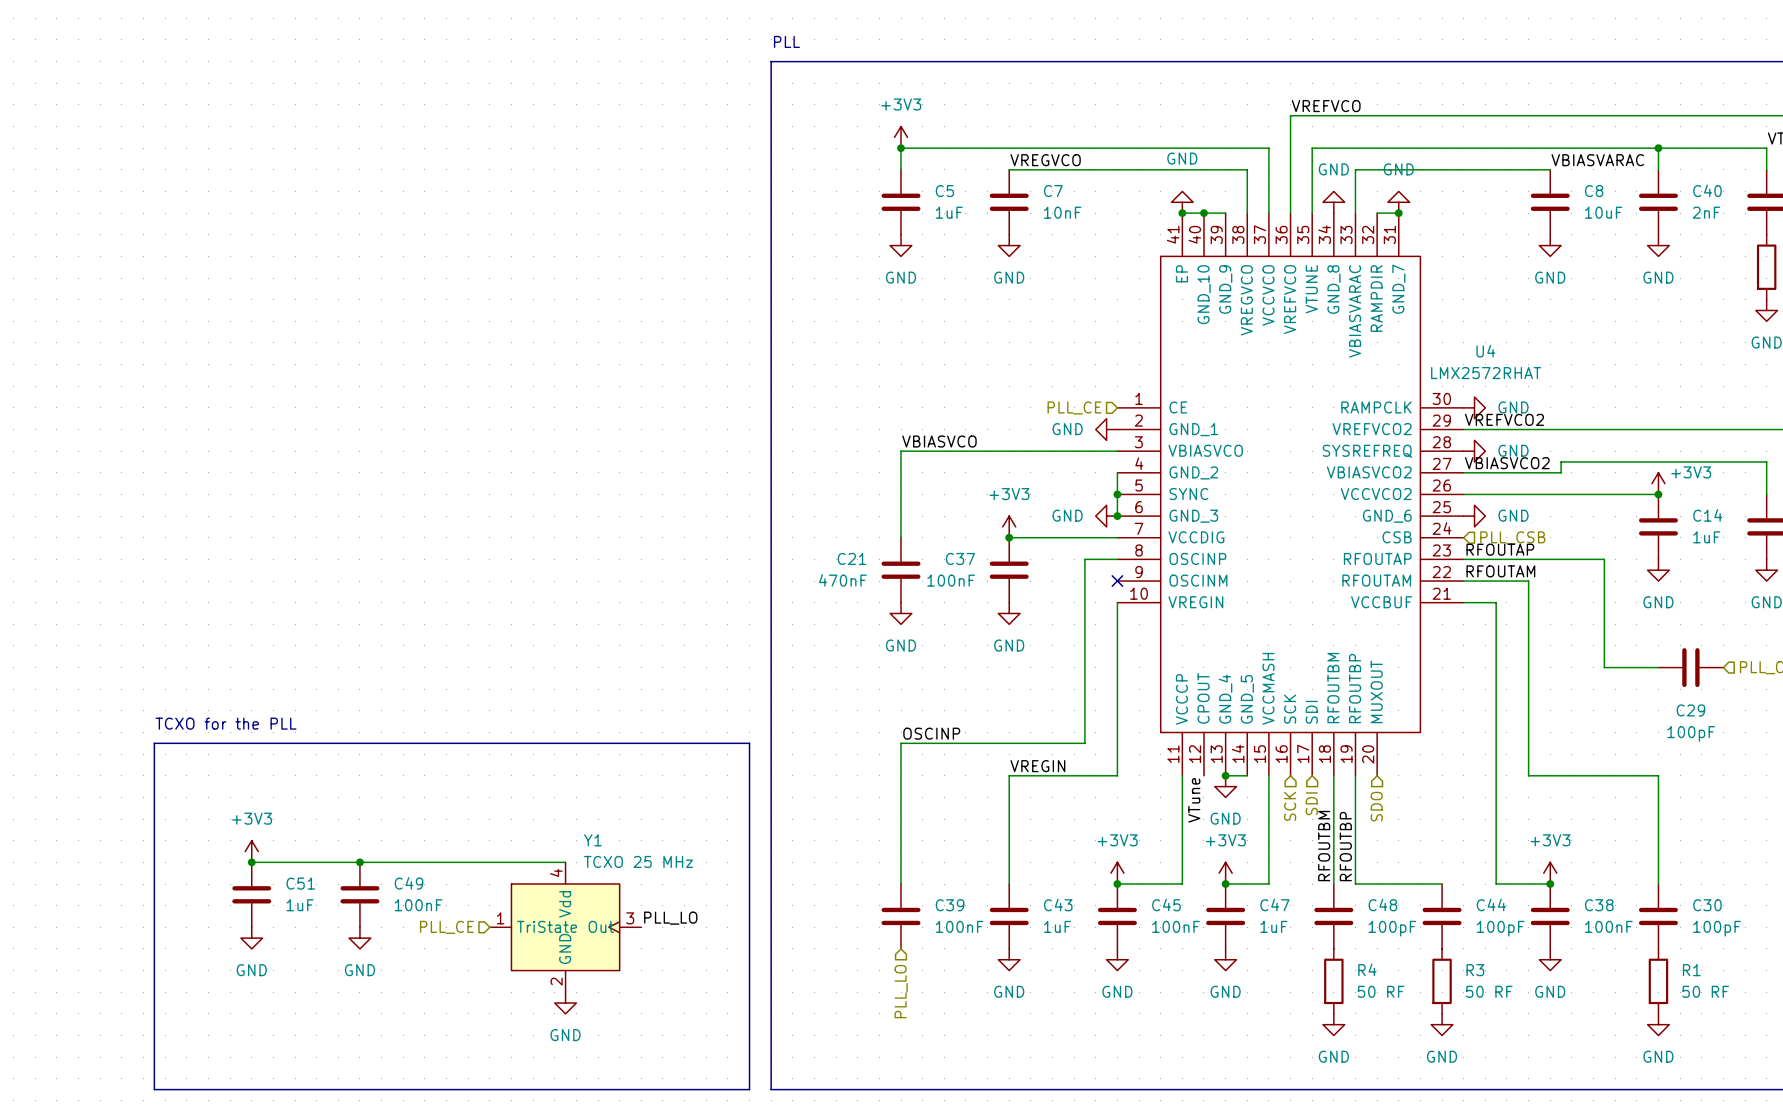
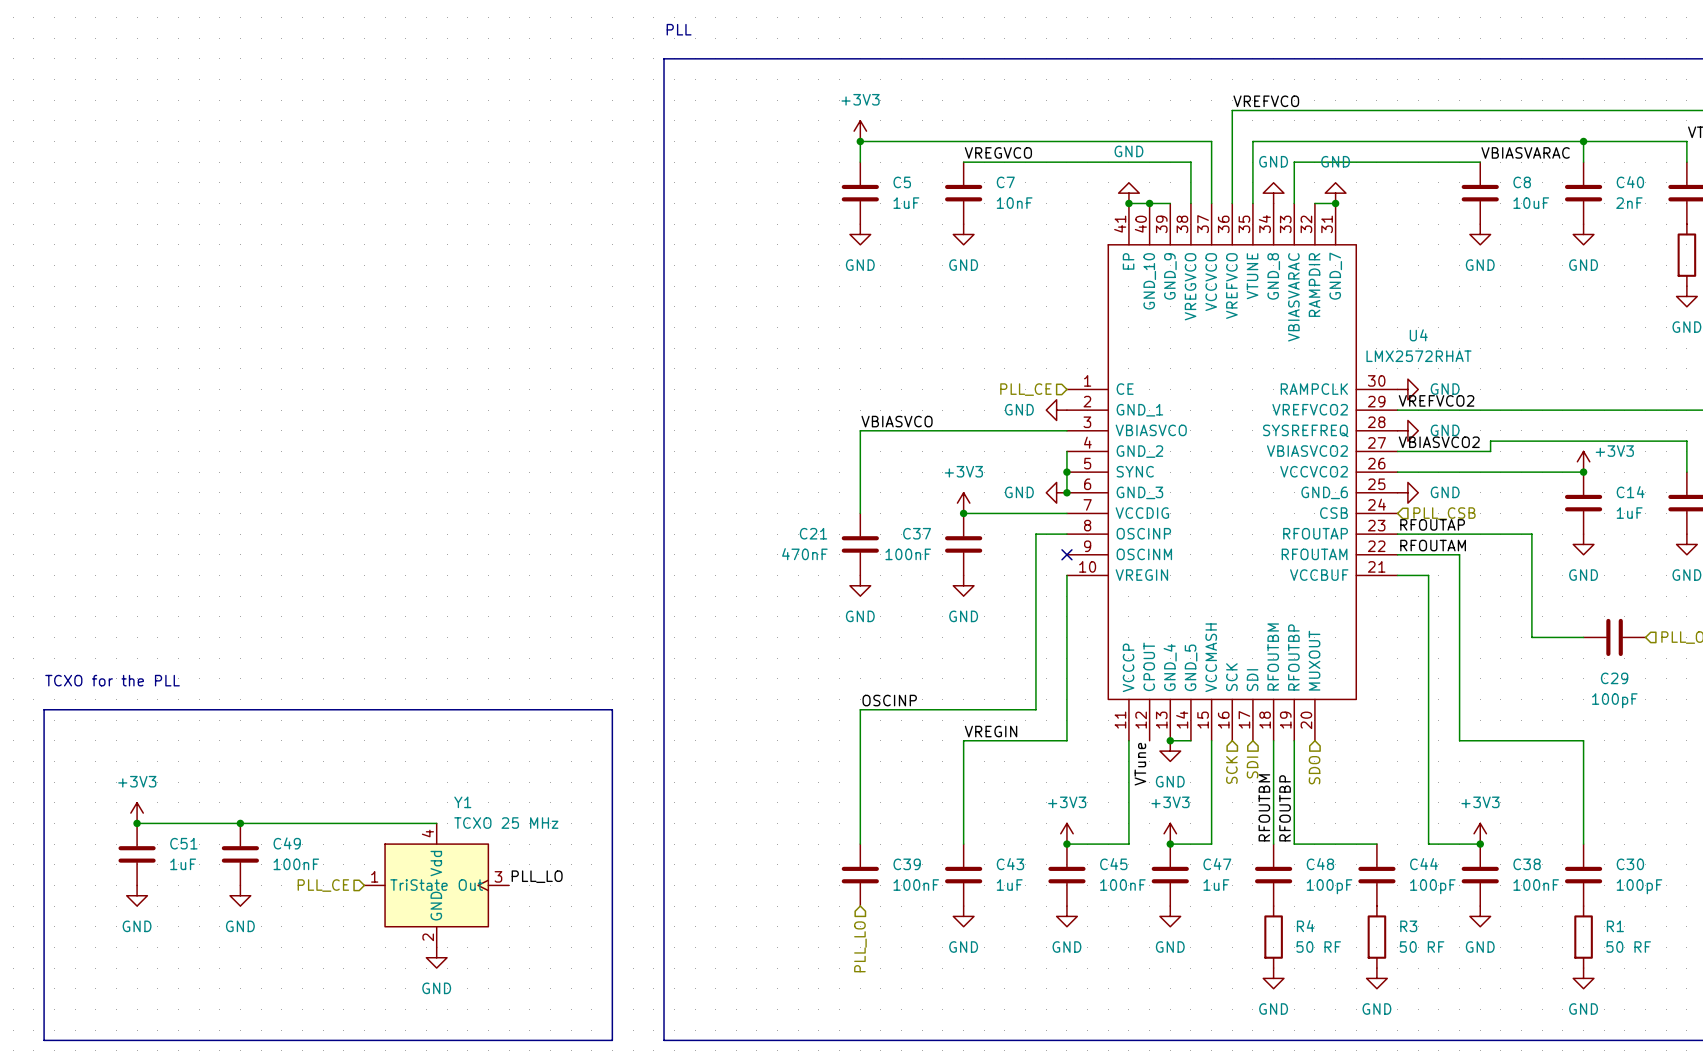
text position: PLL (786, 41) -> PLL (679, 29)
line: (771, 61) (771, 1089) -> (736, 58) (664, 58) (664, 1040)
text position: TCXO for the PLL (226, 723) -> TCXO for the PLL (112, 680)
line: (154, 743) (154, 1089) -> (147, 709) (44, 709) (44, 1040) (147, 1040)
line: (641, 743) (749, 743) (749, 1089) -> (612, 709) (612, 1040)
power symbol position: +3V3 (251, 851) -> +3V3 (137, 813)
wire: none -> (137, 823) (240, 823)
junction: none -> (137, 823)
junction: (359, 862) -> none
wire: (457, 862) (565, 862) -> none
C51 name: C51 (300, 883) -> C49 (287, 843)
C51: none -> 1uF (137, 854)
C49: 100nF (359, 894) -> none
C51 value: 1uF (300, 905) -> 100nF (296, 864)
label position: PLL_LO (670, 918) -> PLL_LO (537, 876)
hierarchical label position: PLL_CE (446, 927) -> PLL_CE (323, 885)
Y1 position: (565, 927) -> (436, 885)
power symbol: none -> GND (137, 895)
power symbol: GND (359, 938) -> none
power symbol: none -> GND (436, 957)
power symbol: GND (565, 1003) -> none
line: (641, 1089) (695, 1089) -> none
line: none -> (715, 1040) (736, 1040)

